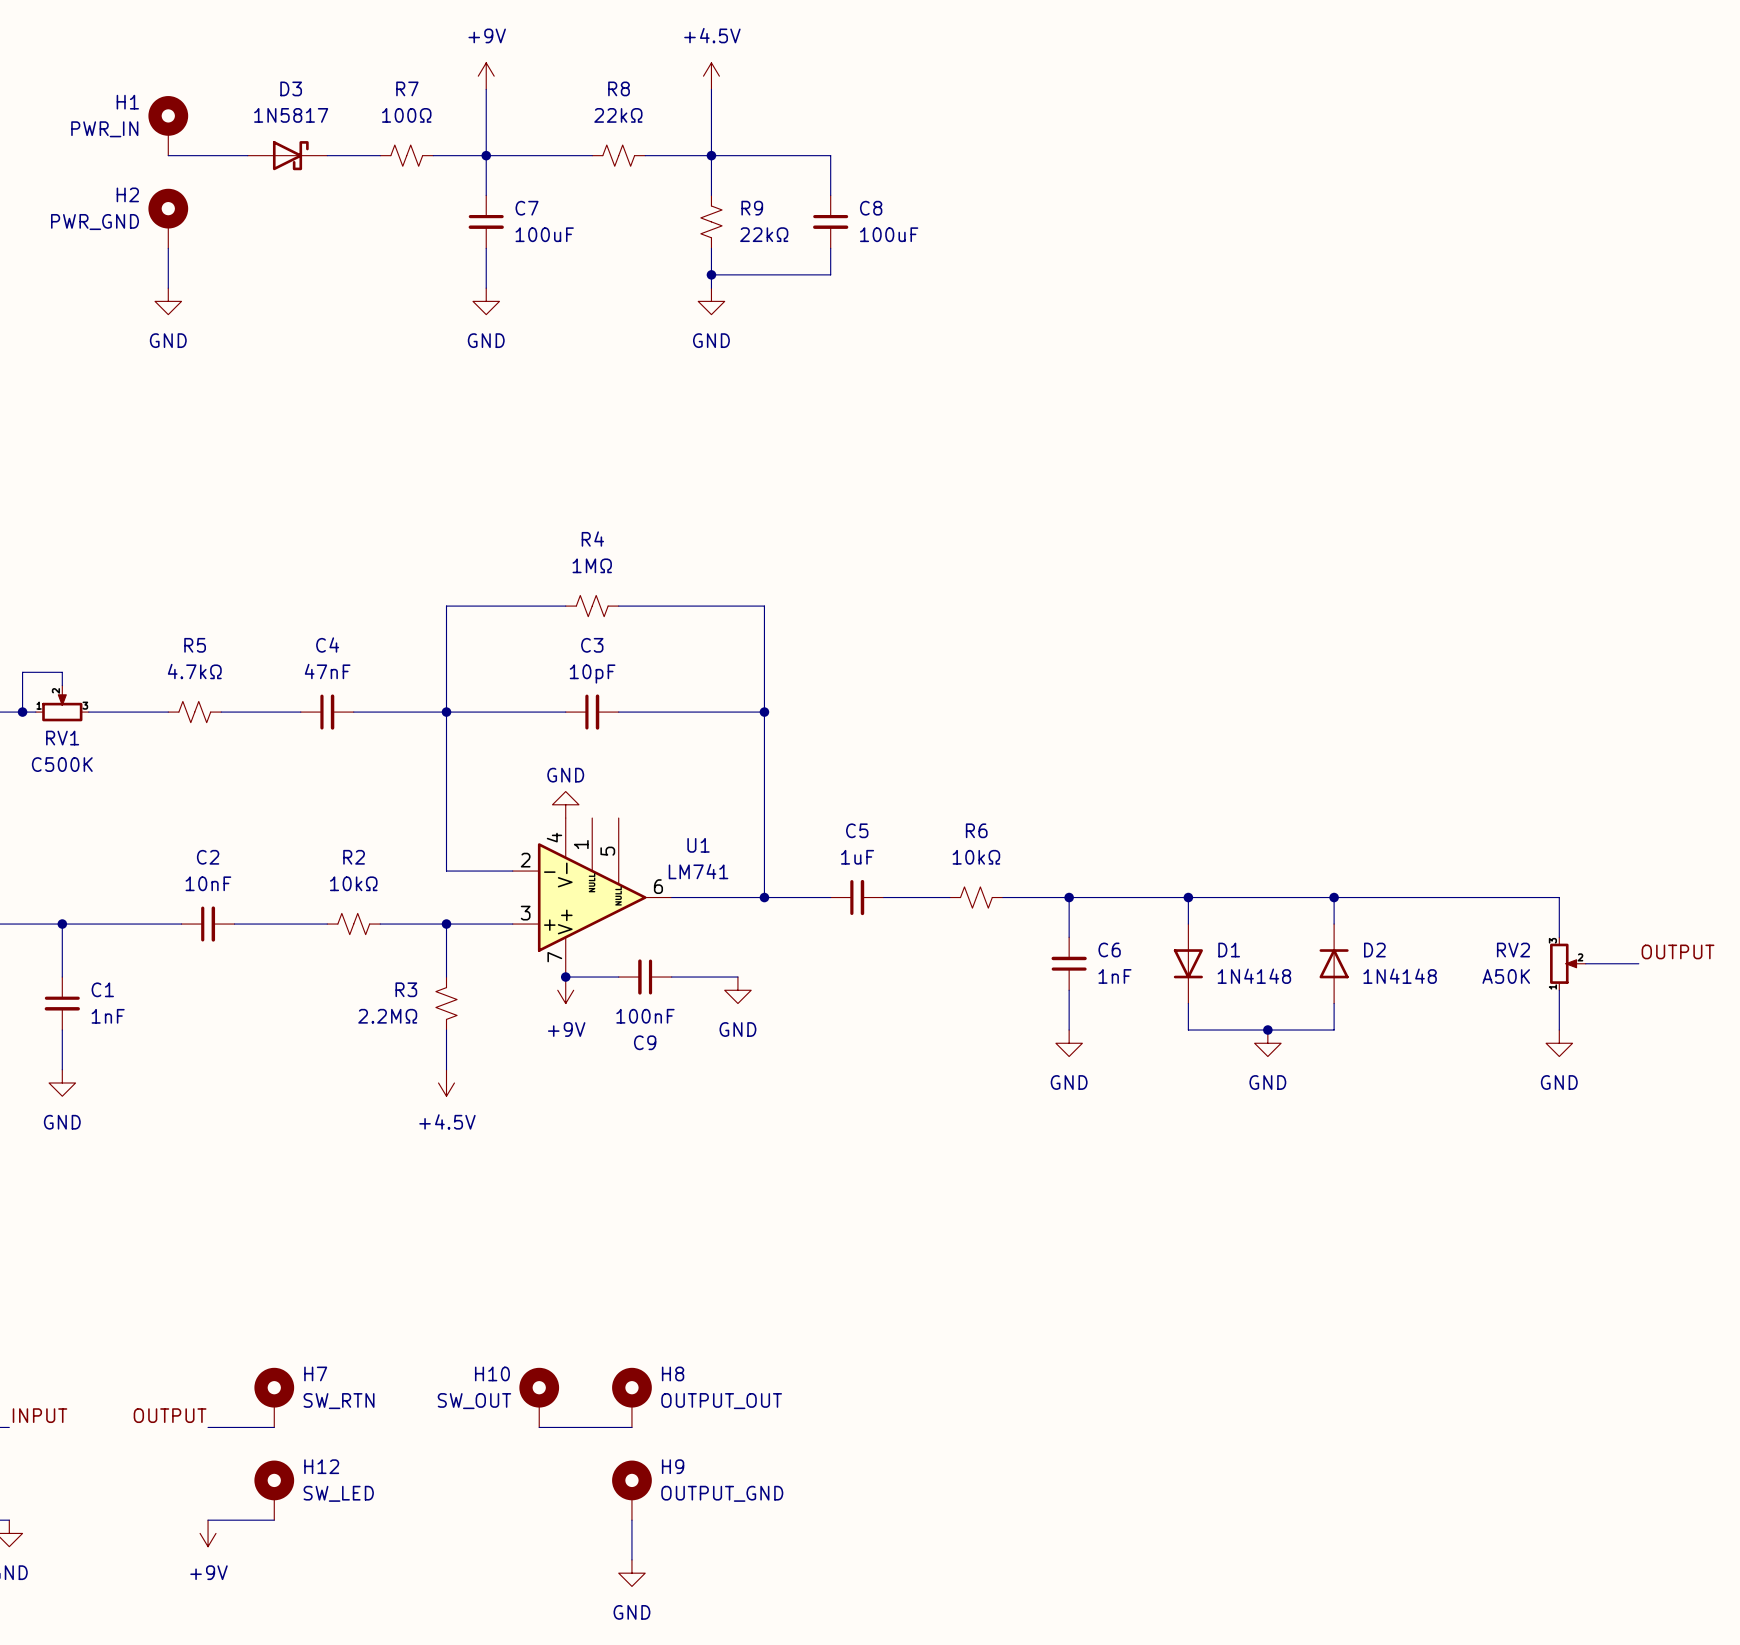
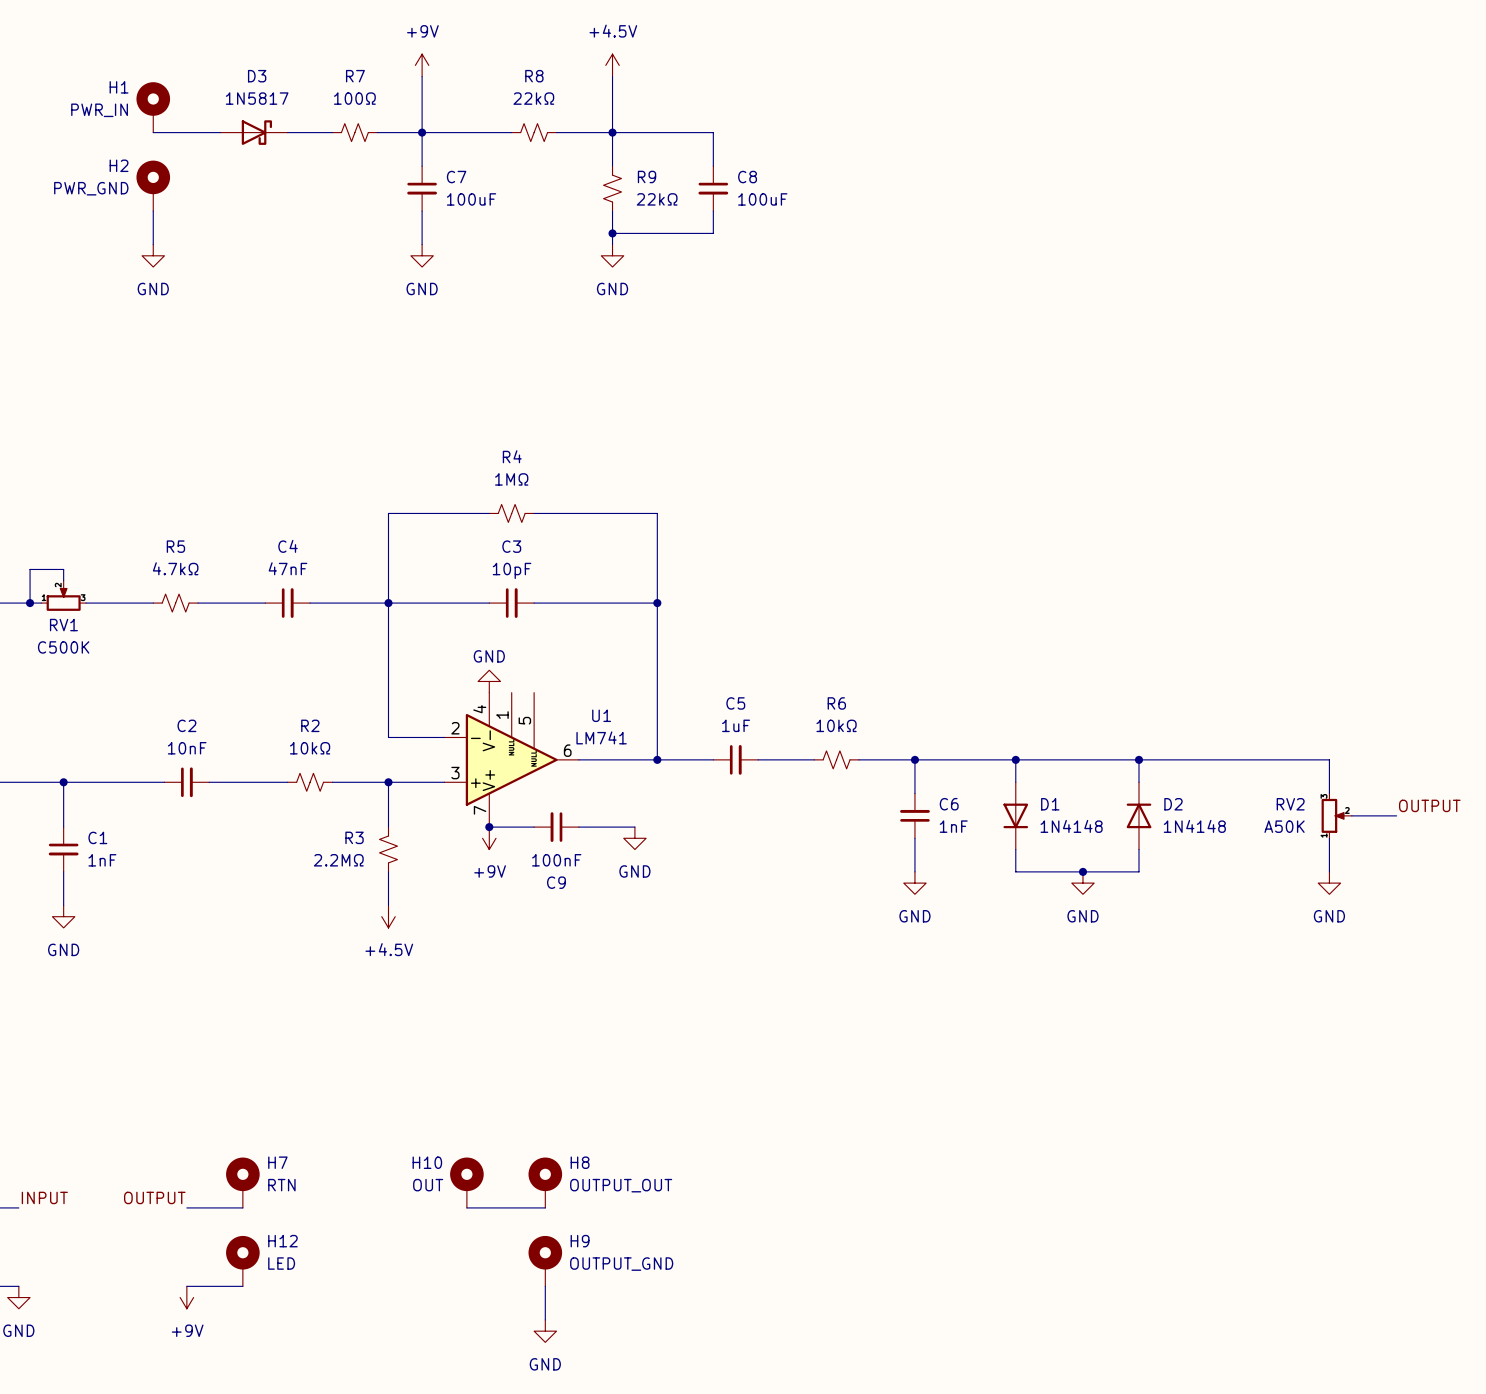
H7 value: SW_RTN (339, 1401) -> RTN (281, 1185)
H10 value: SW_OUT (474, 1401) -> OUT (428, 1185)
H12 value: SW_LED (338, 1493) -> LED (281, 1263)

